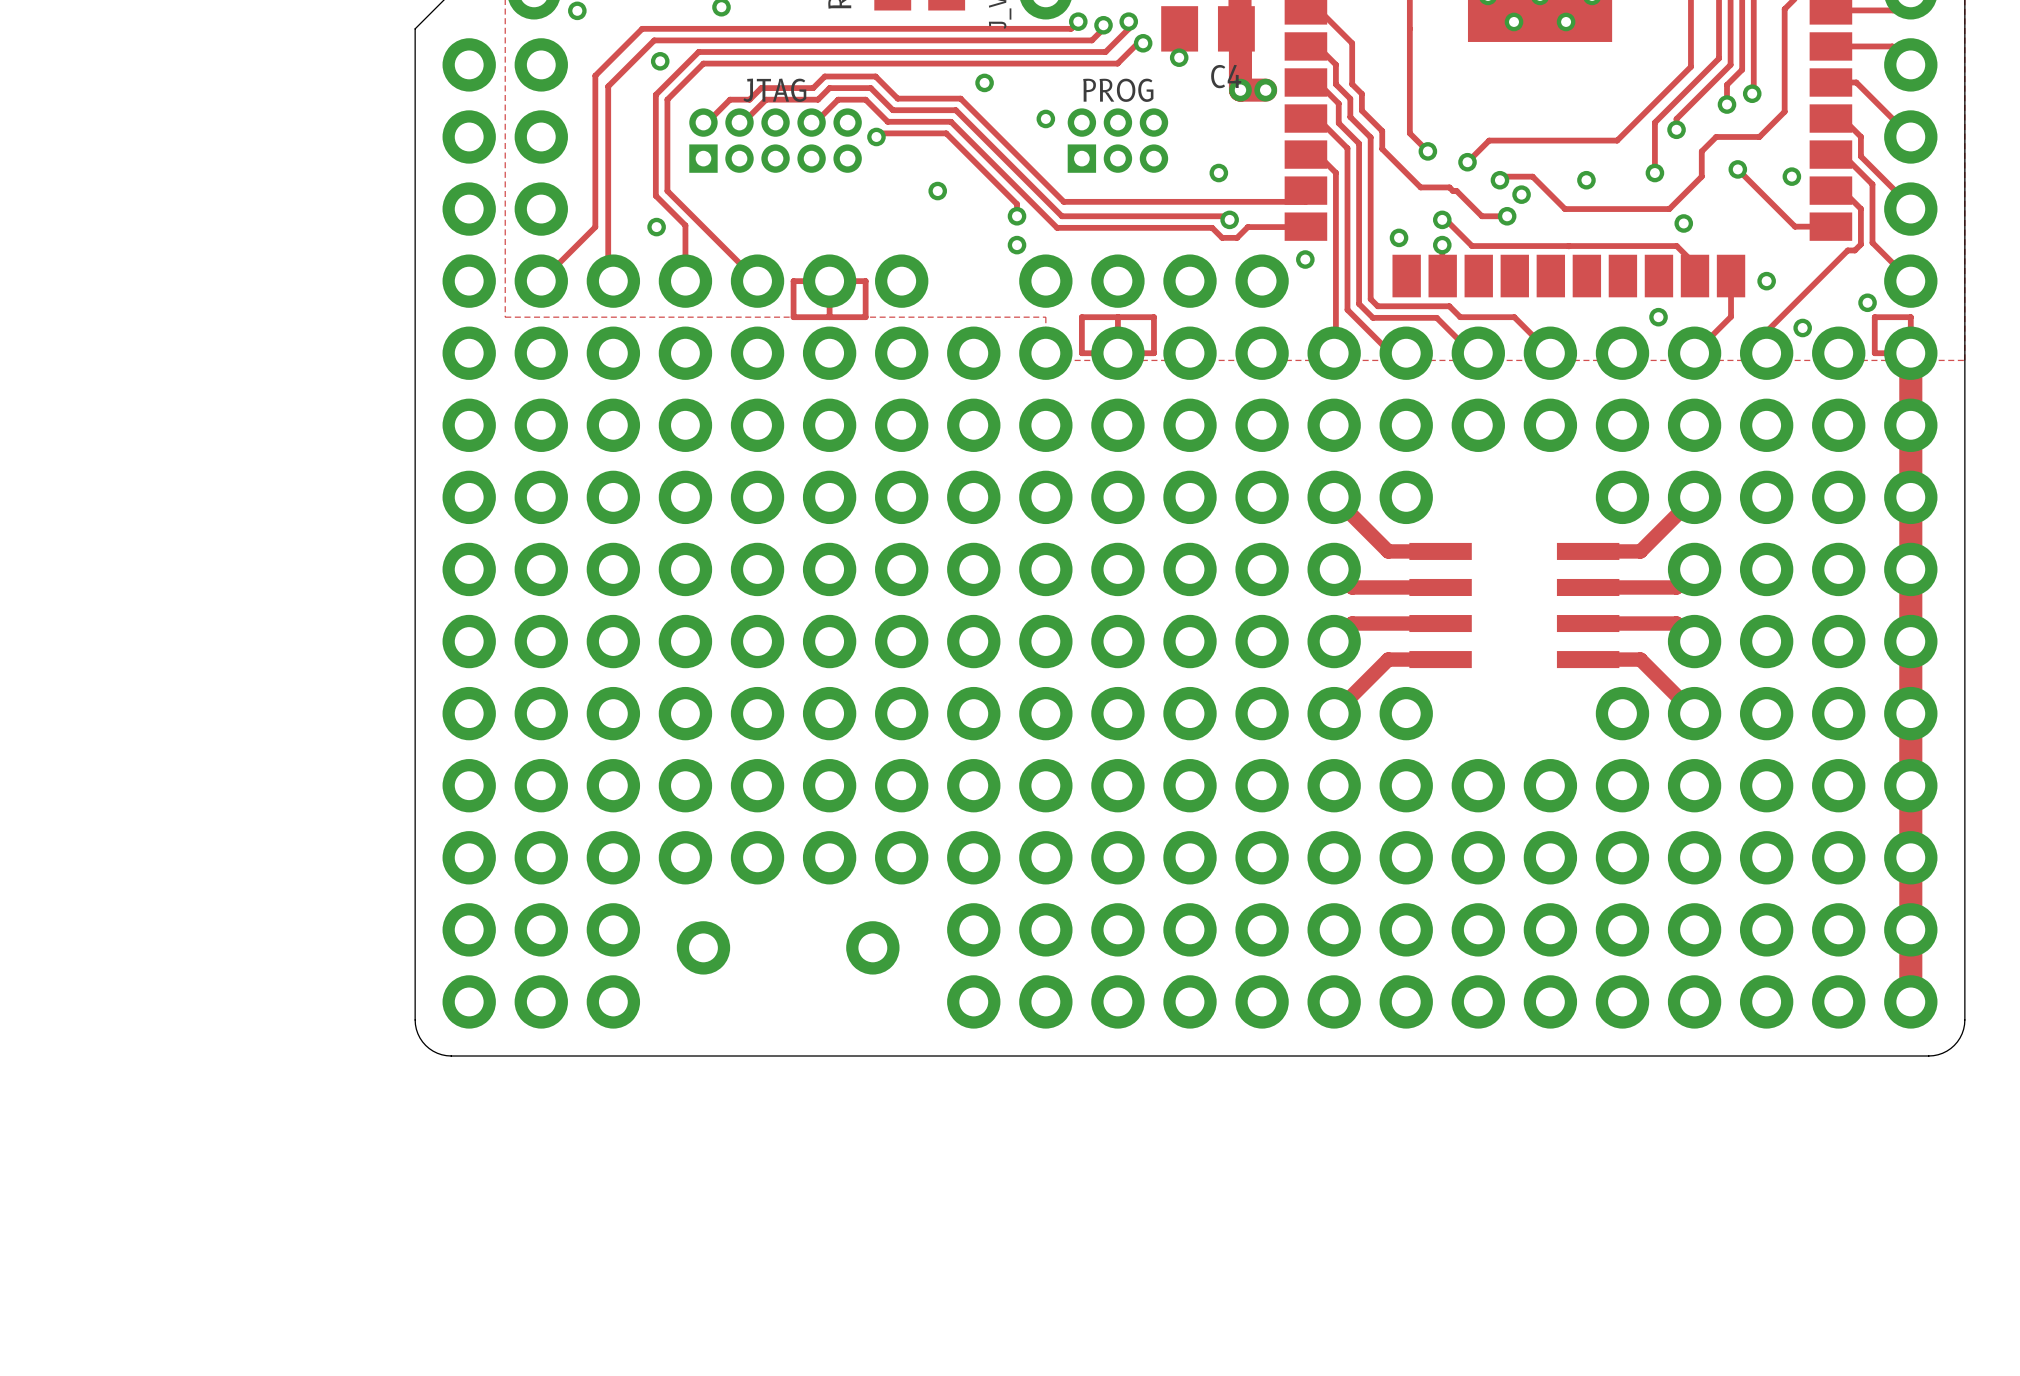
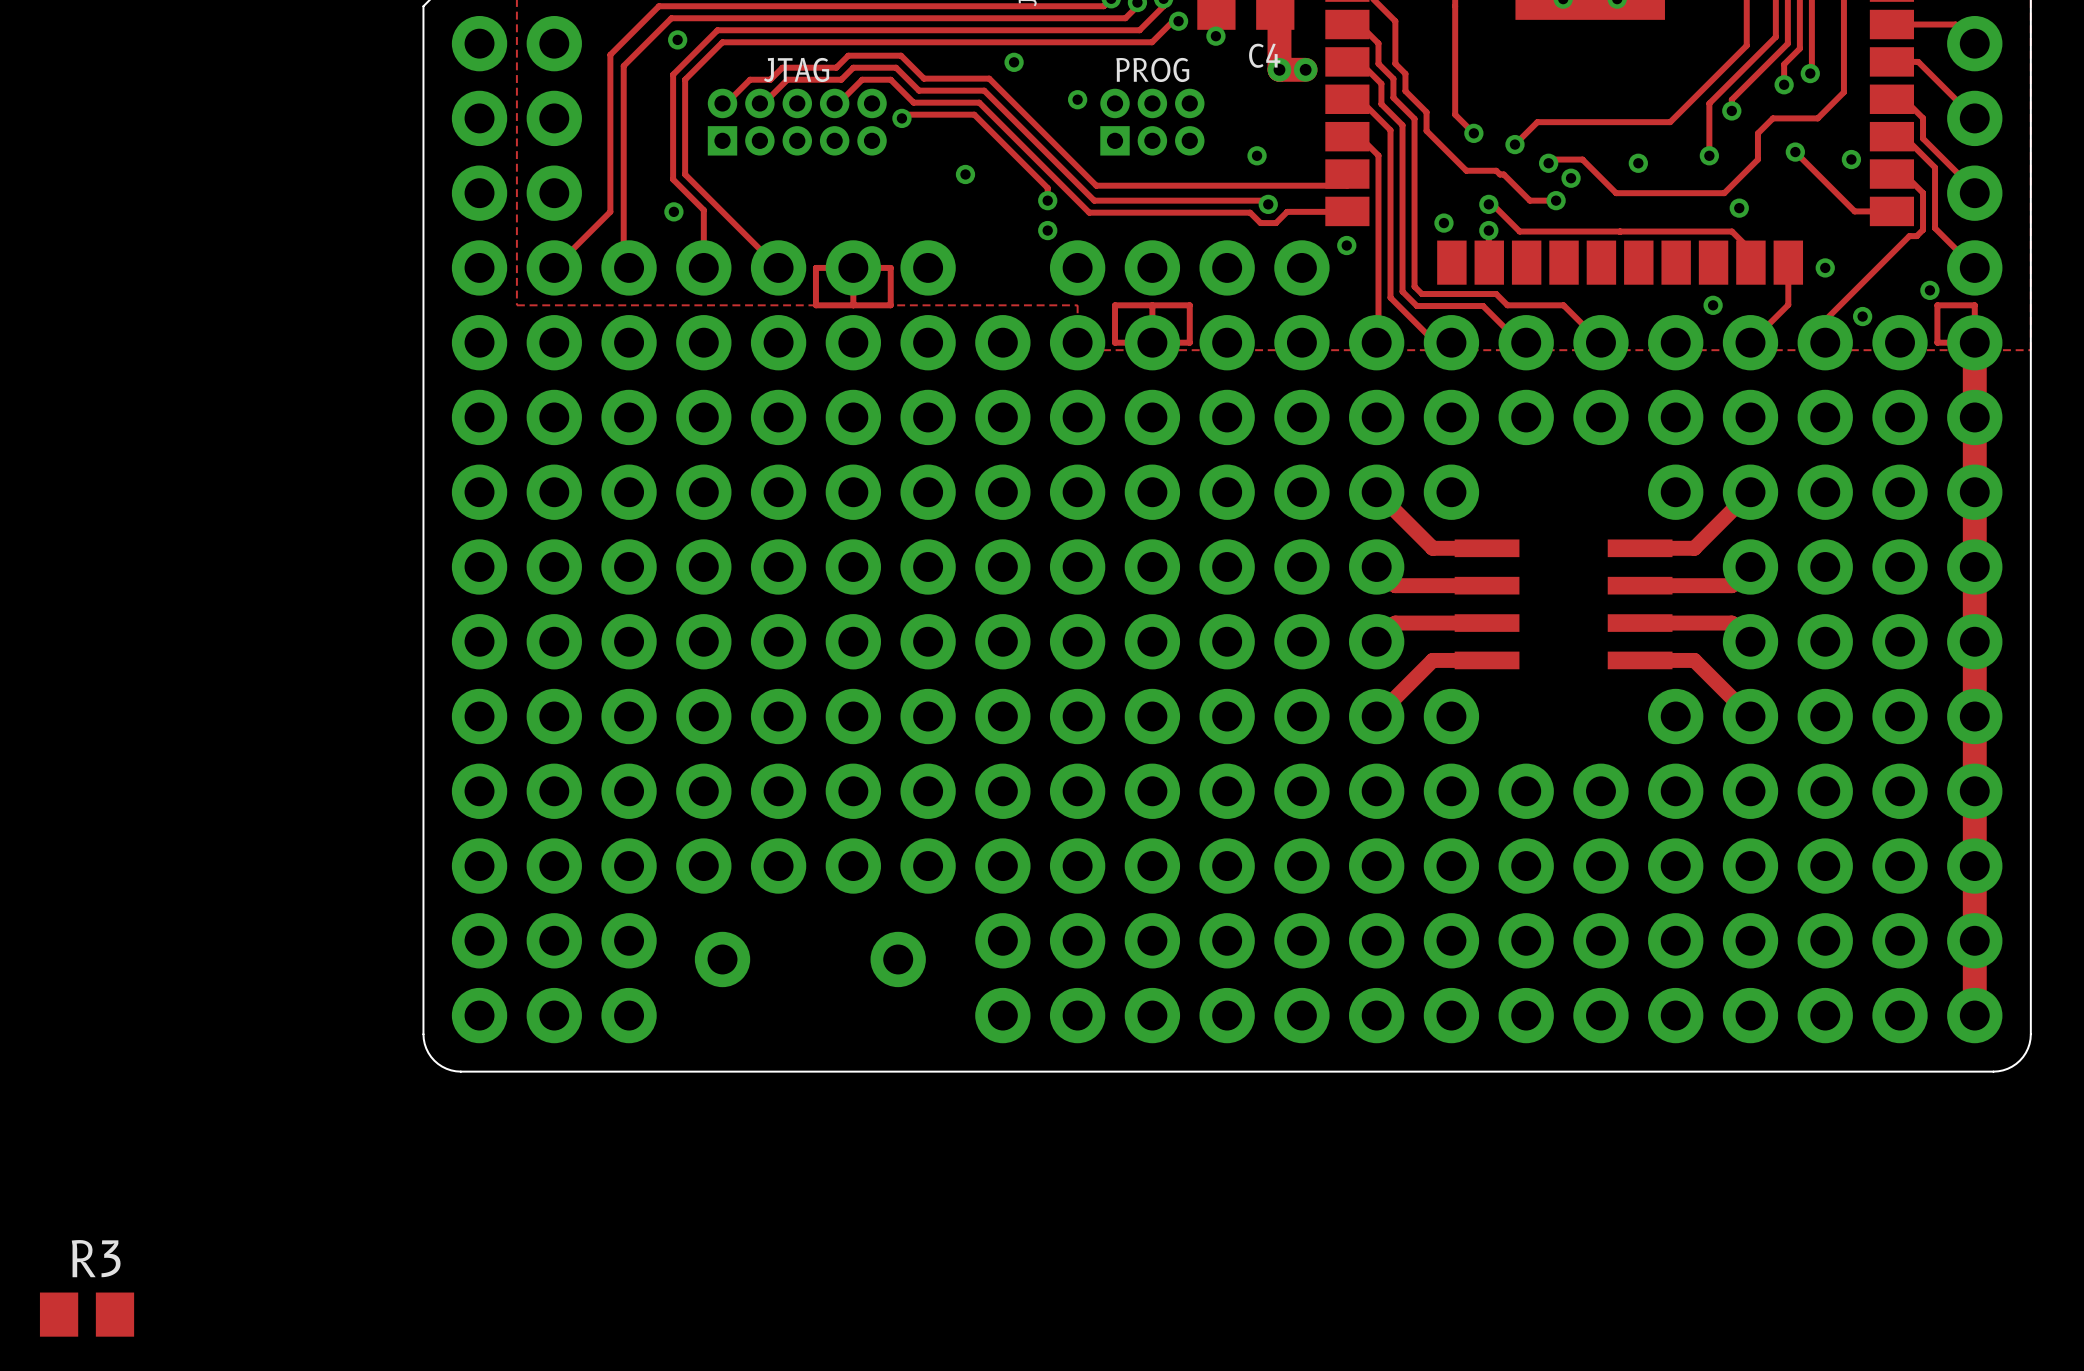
R3: none -> (87, 1314)

